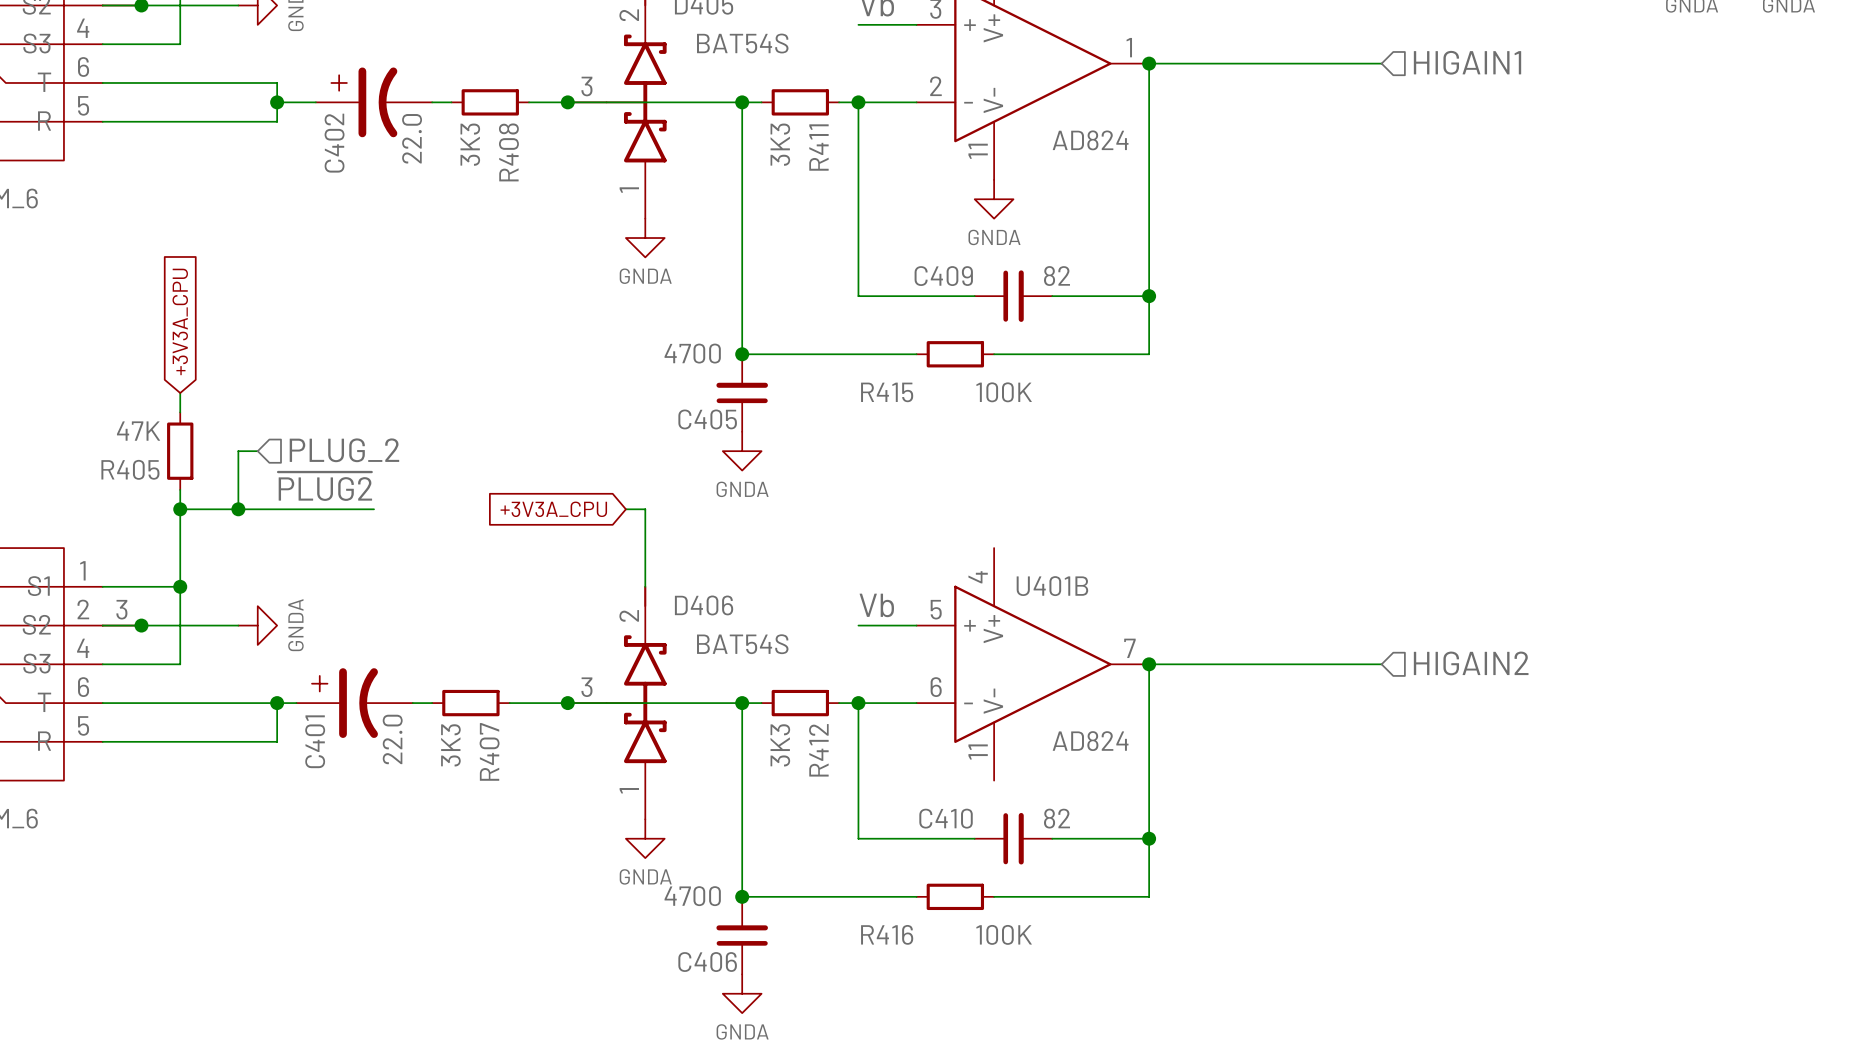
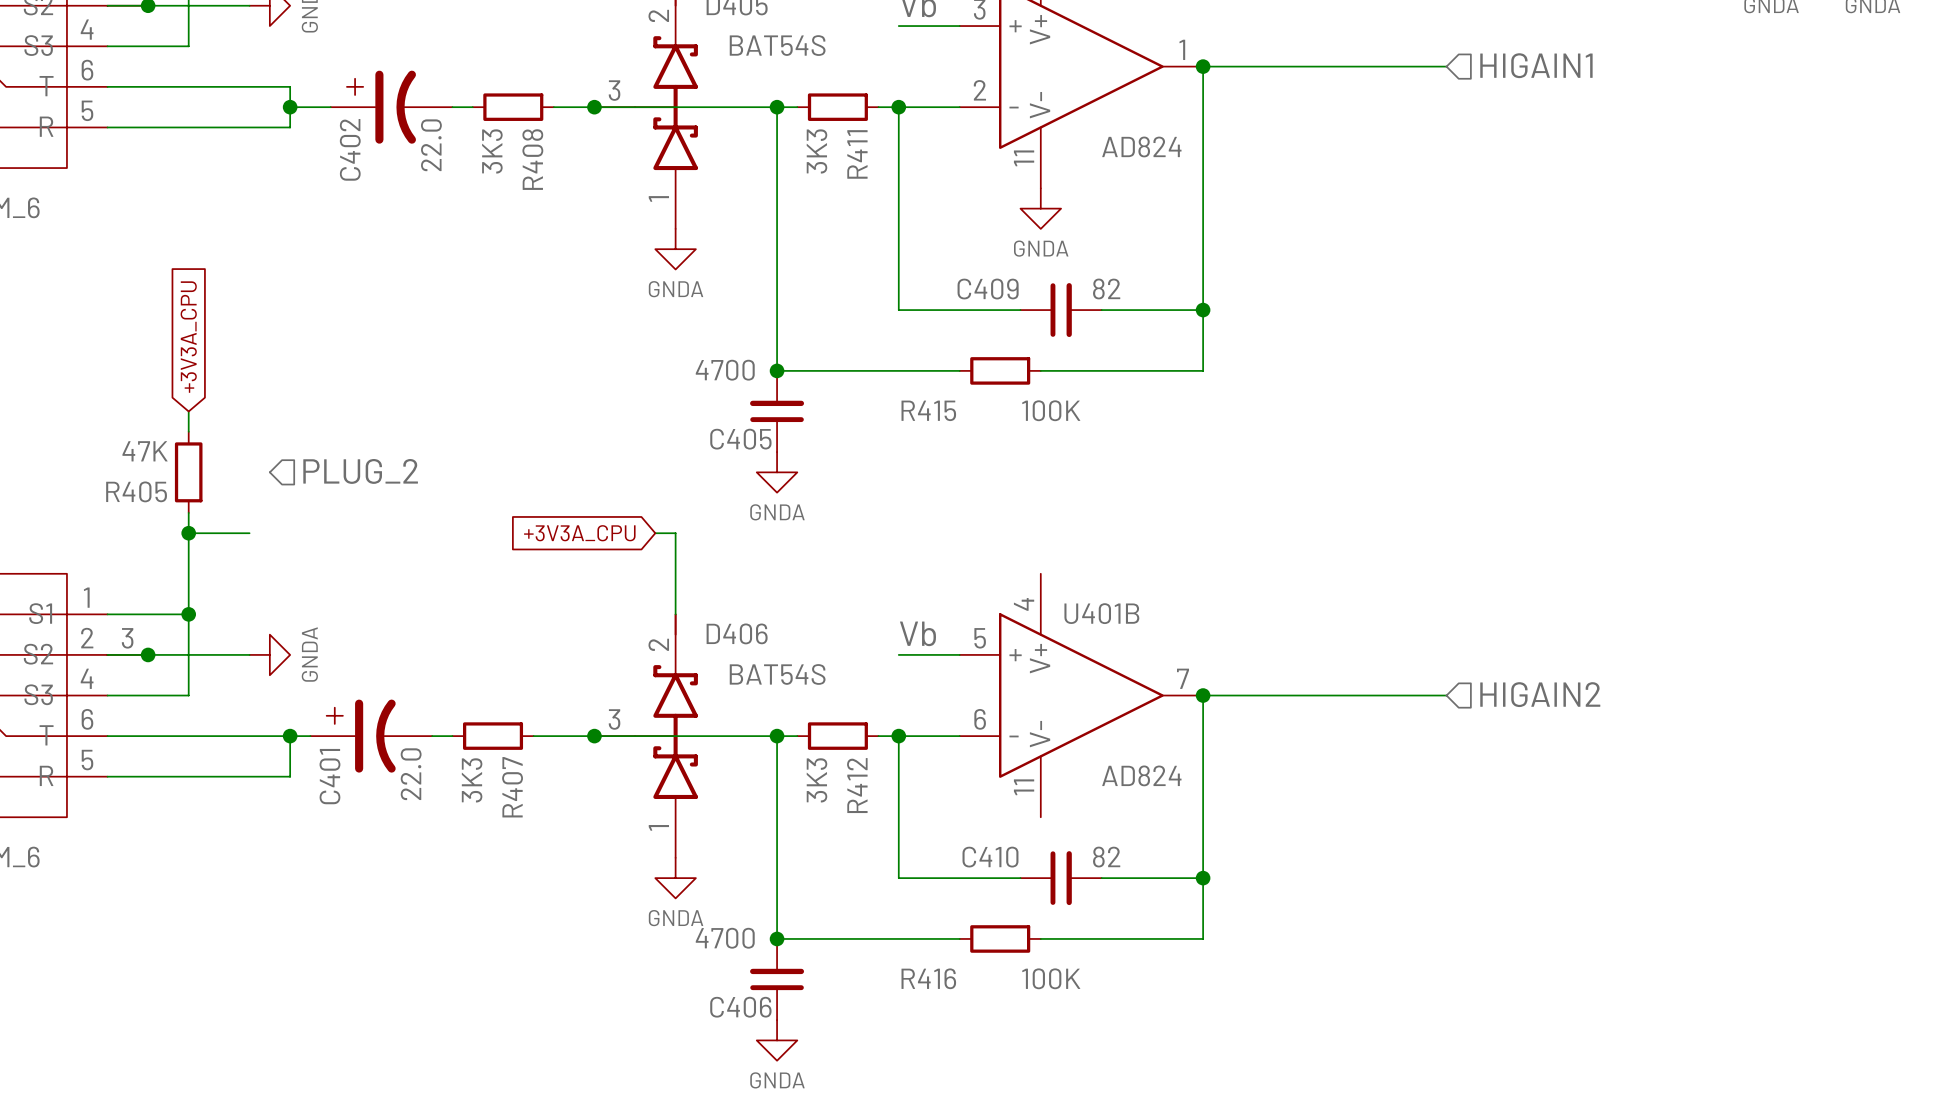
wire: (257, 451) (238, 451) (238, 509) (374, 509) -> none
label: ~{PLUG2} (325, 486) -> none
junction: (238, 509) -> none

